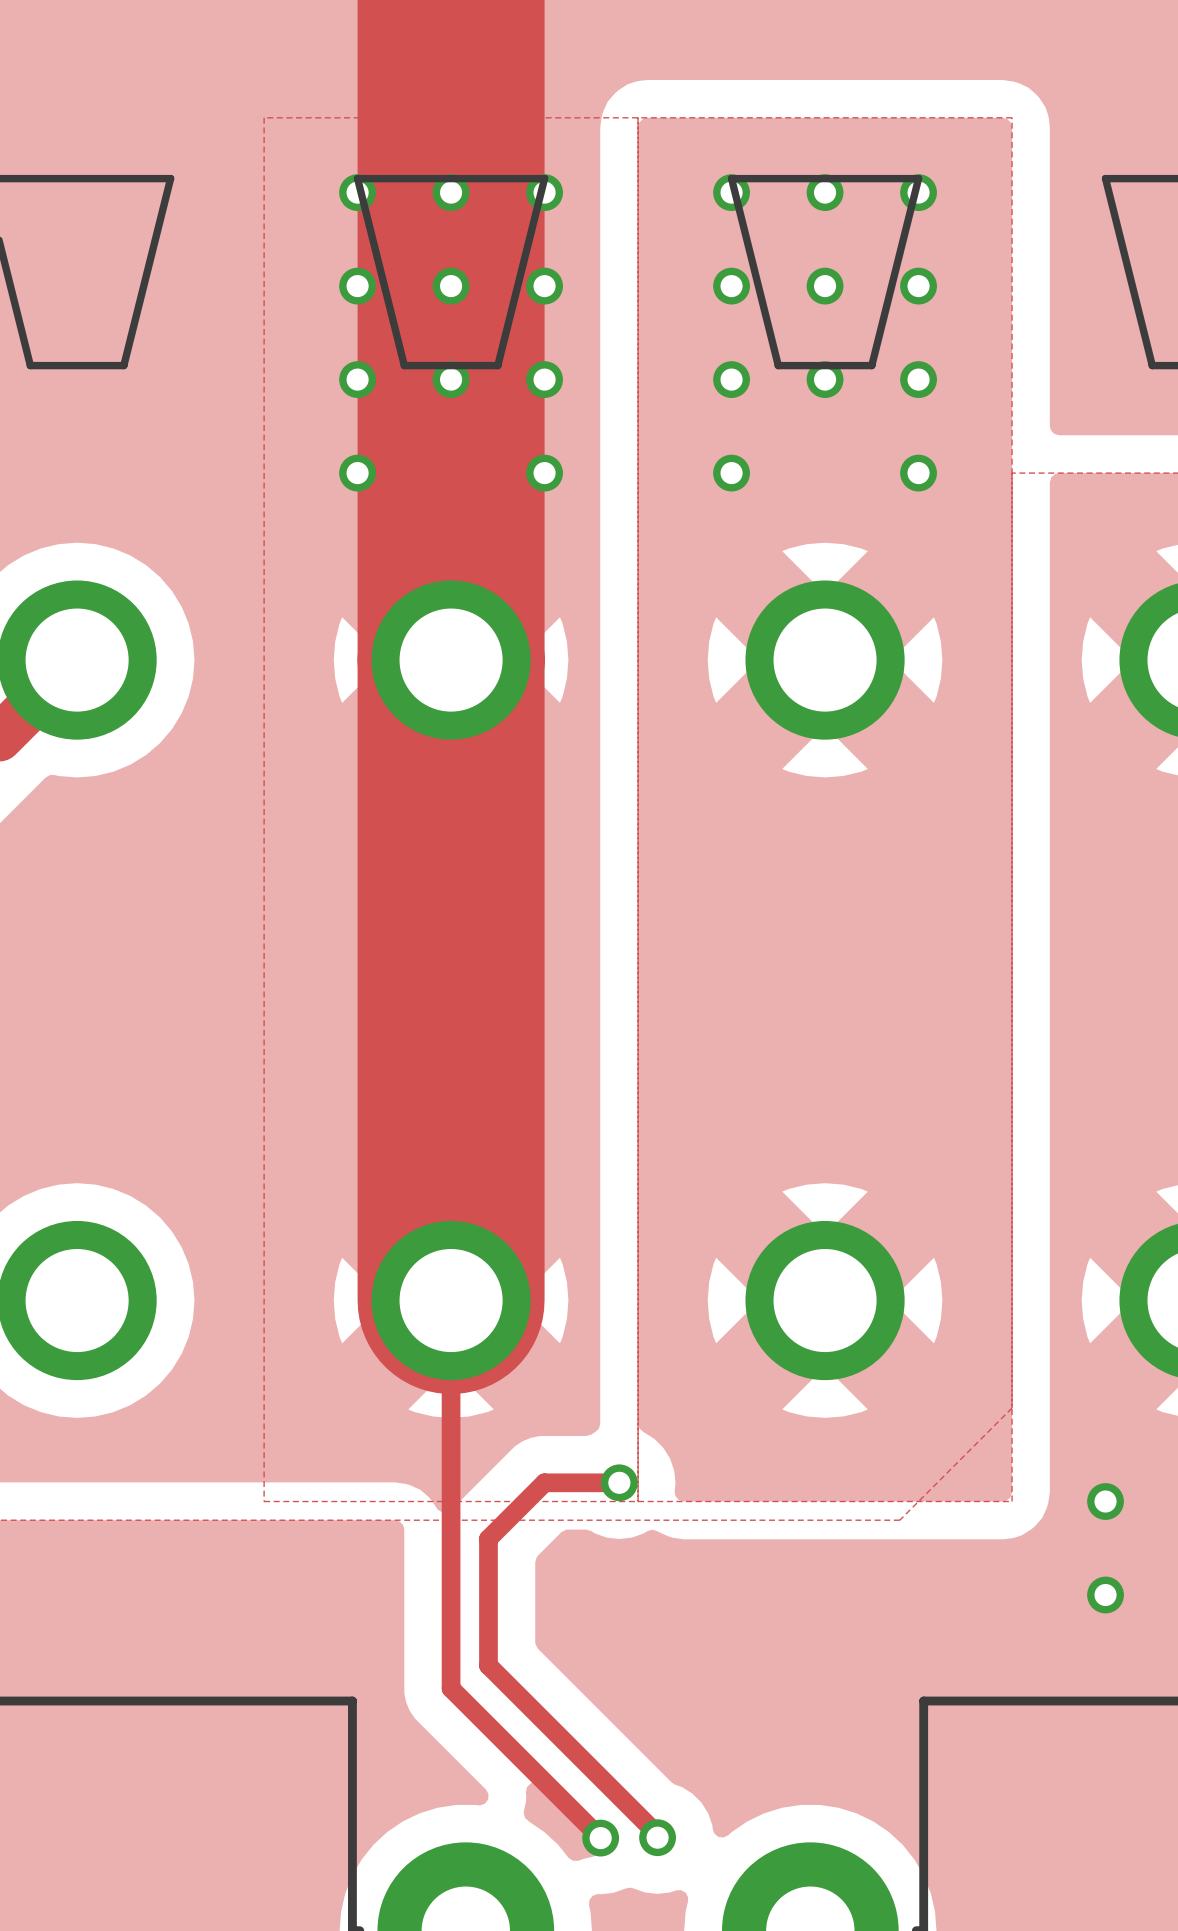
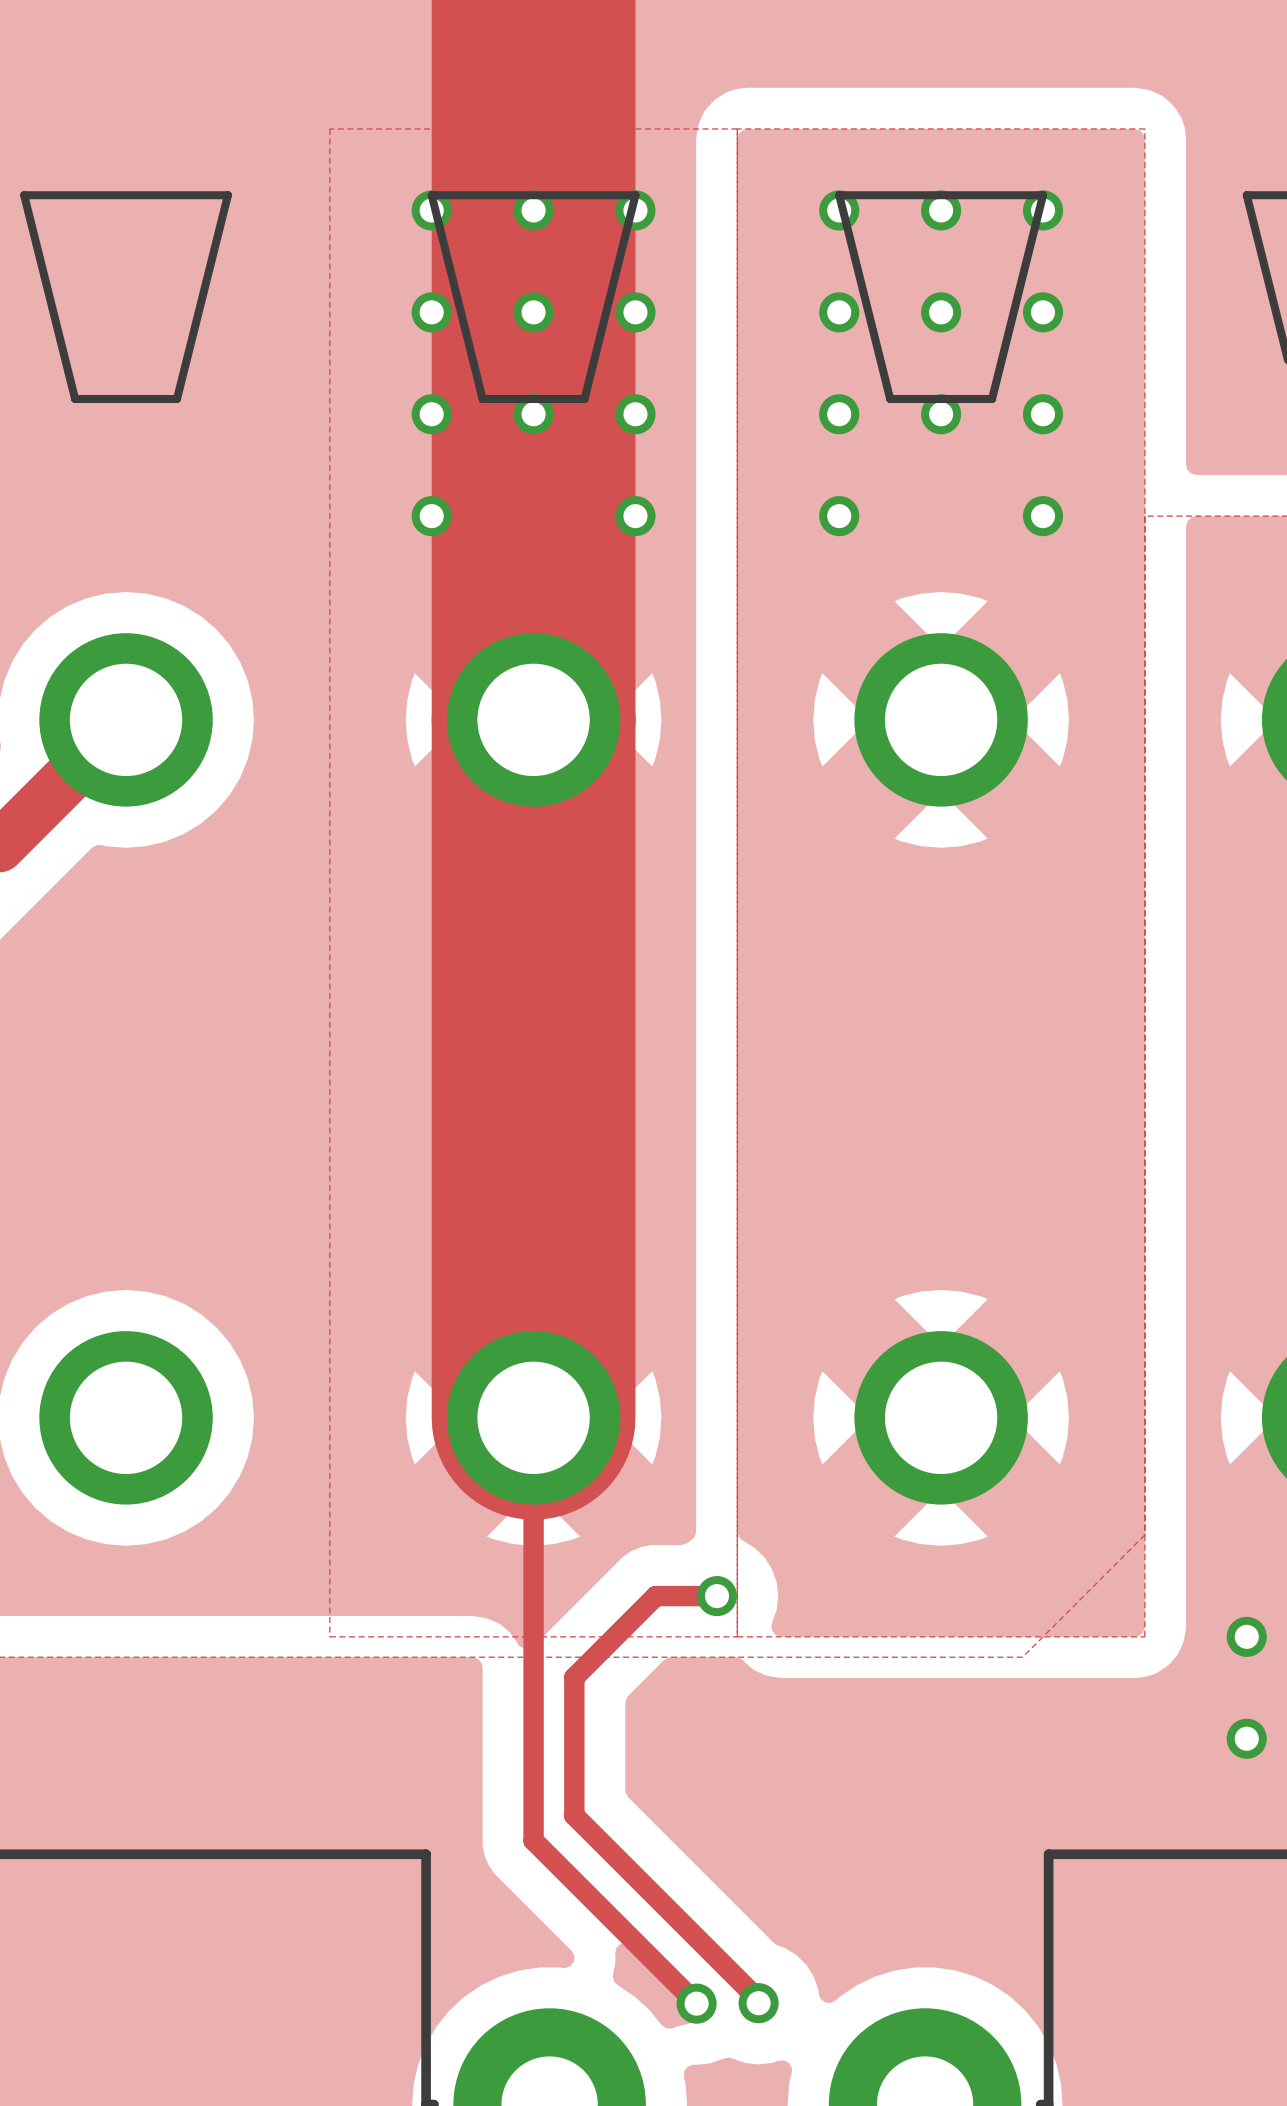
track: (544, 1482) (619, 1482) -> (635, 1616) (655, 1596) (716, 1596)
via position: (619, 1482) -> (716, 1596)

